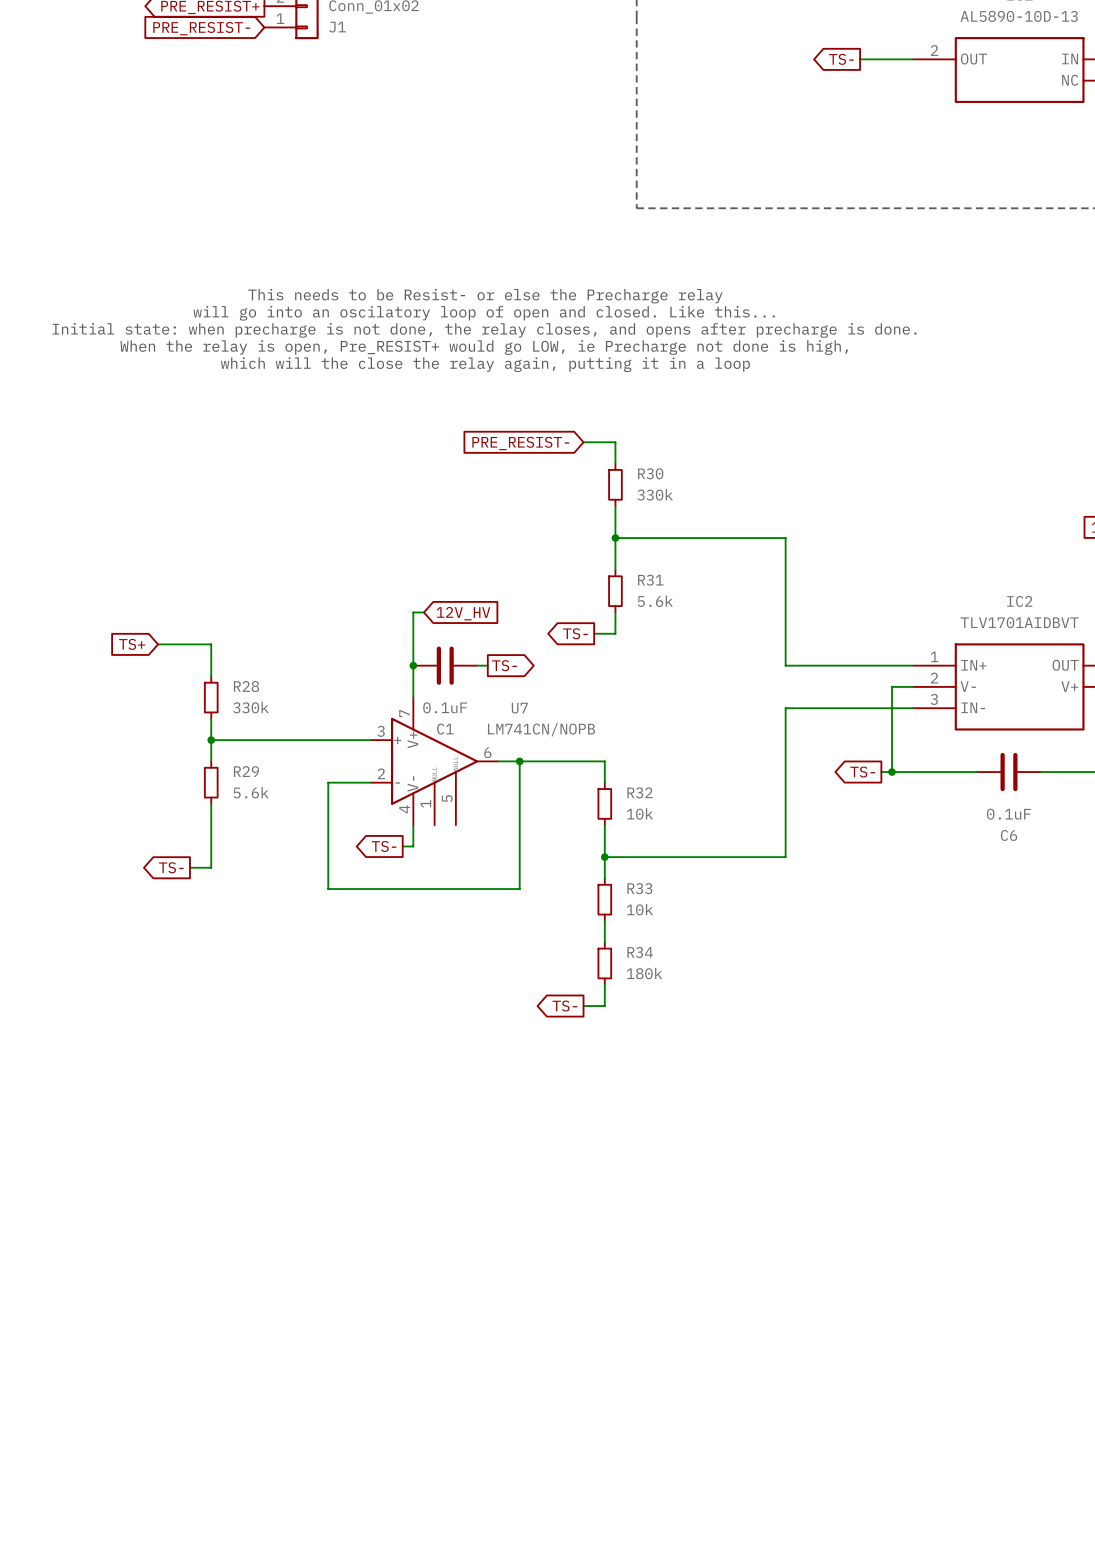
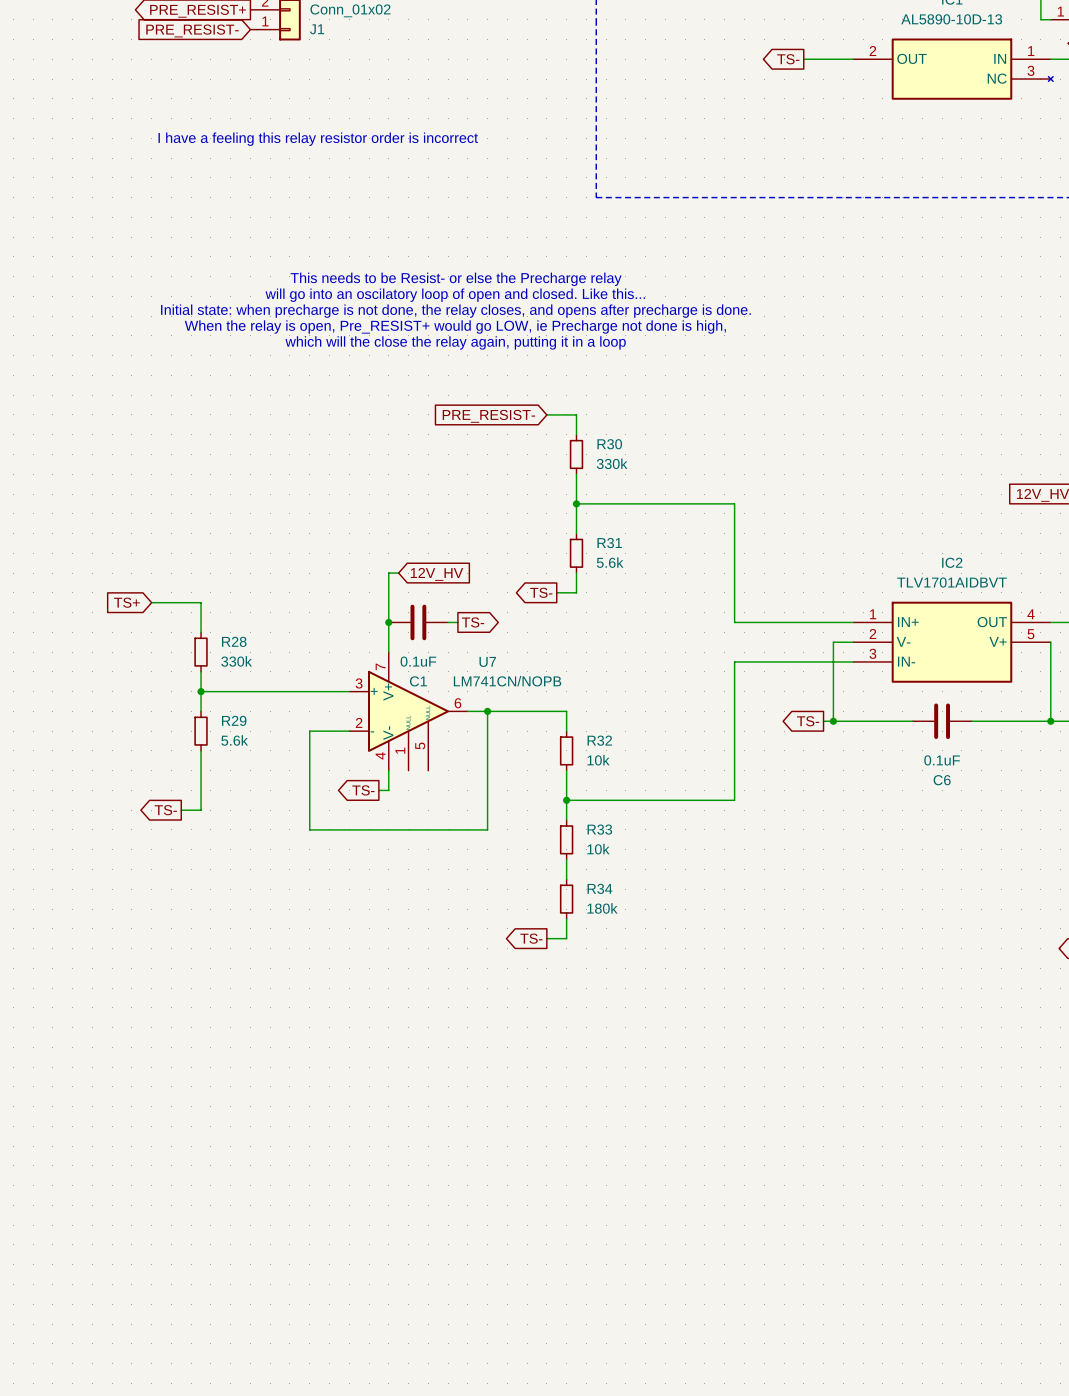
text: none -> I have a feeling this relay resistor order is incorrect (318, 139)

